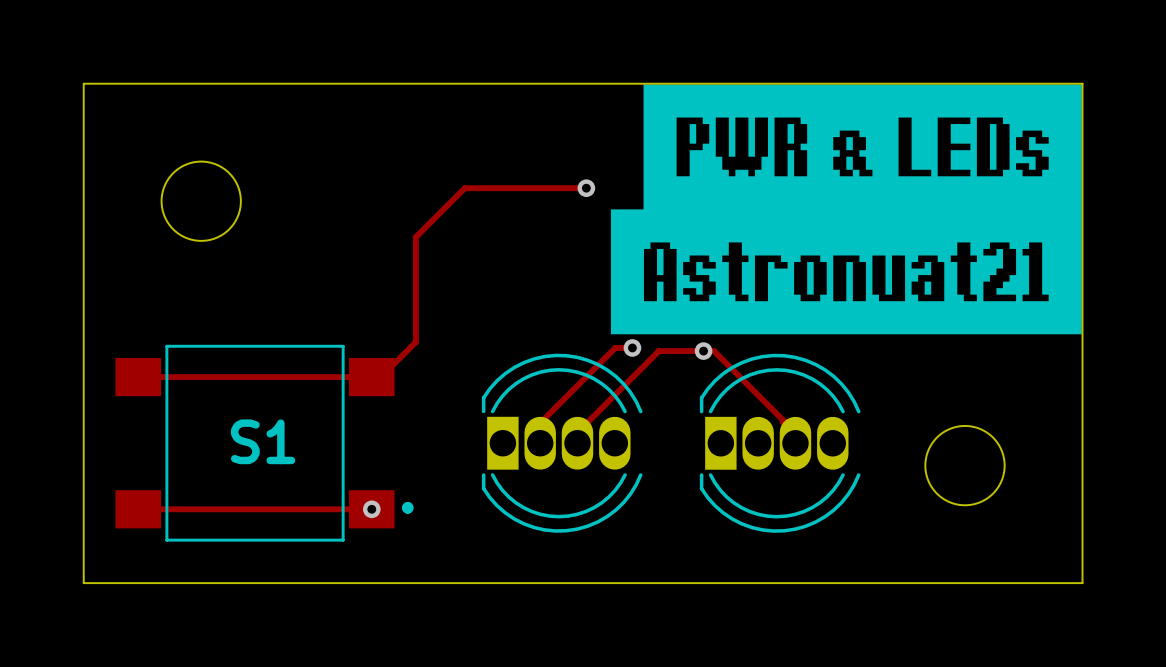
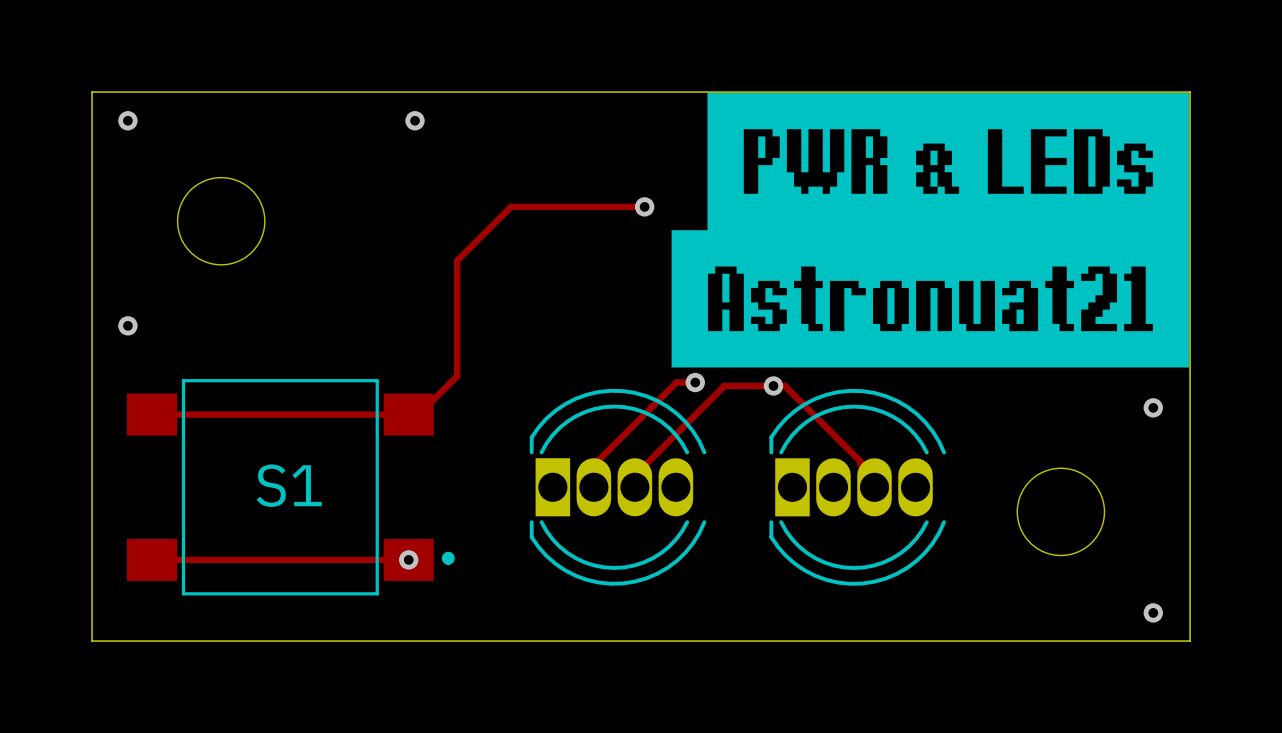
via: none -> (127, 120)
via: none -> (415, 120)
via: none -> (127, 325)
via: none -> (1153, 407)
via: none -> (1153, 612)

